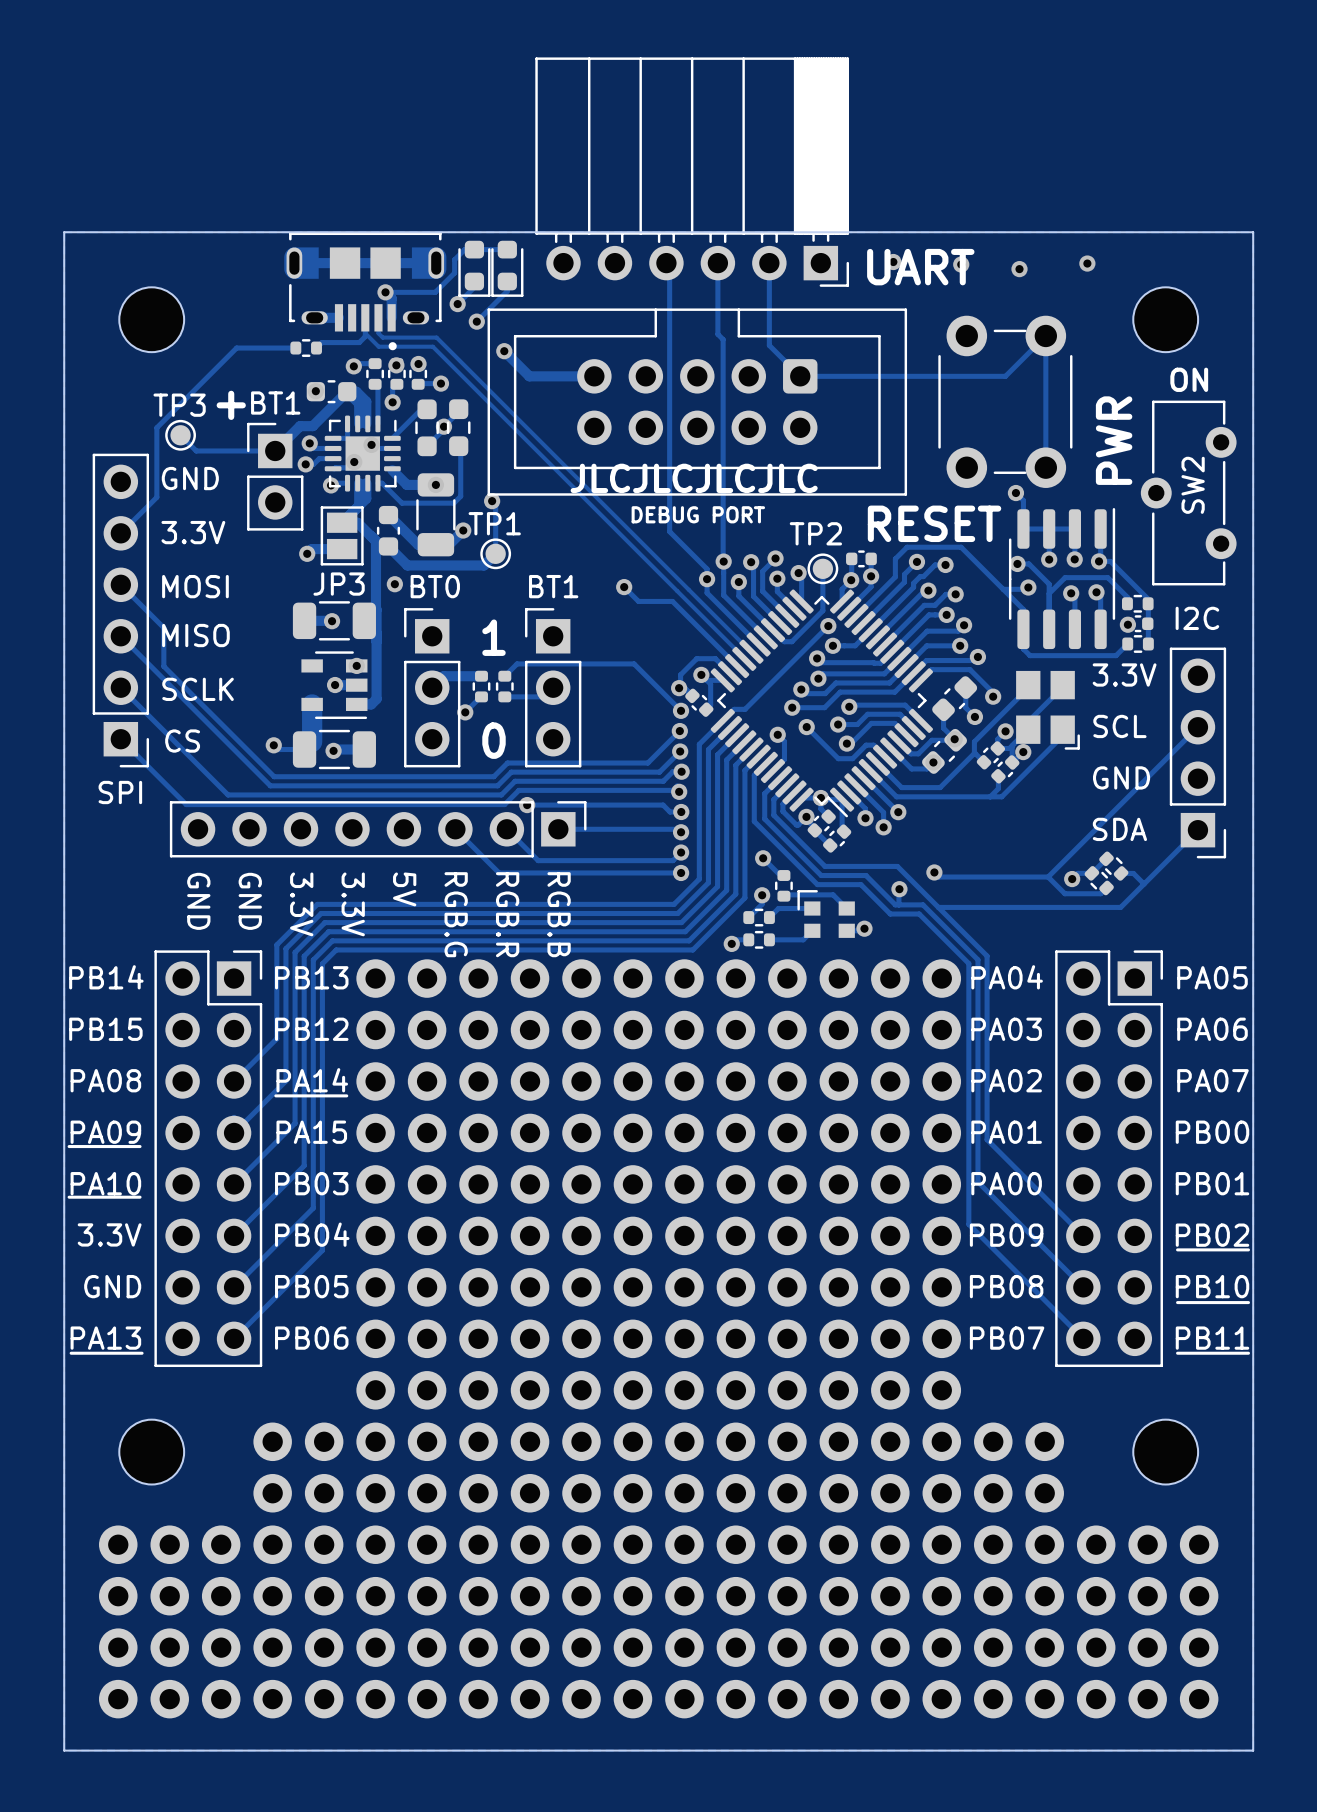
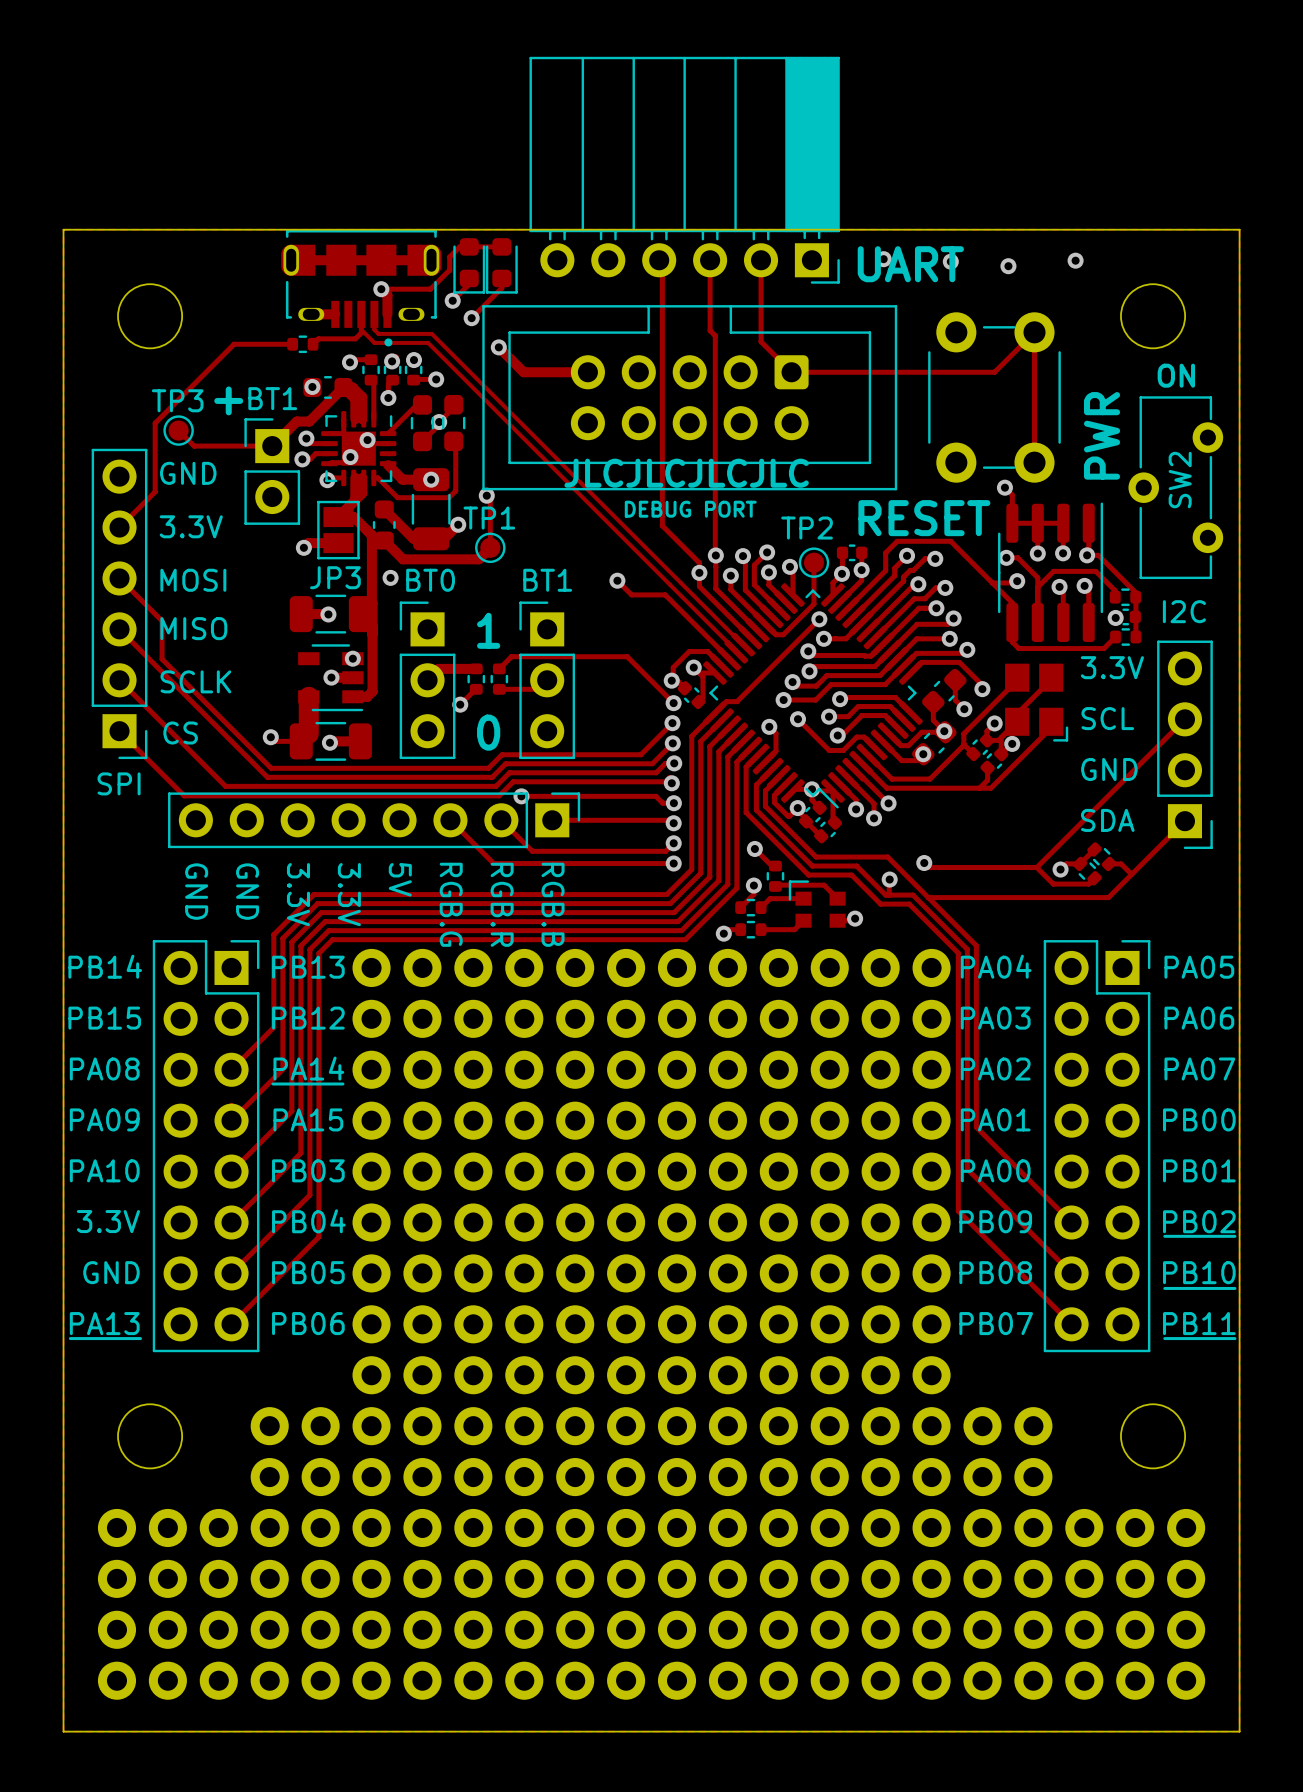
line: (69, 1146) (140, 1146) -> none
line: (69, 1197) (140, 1197) -> none

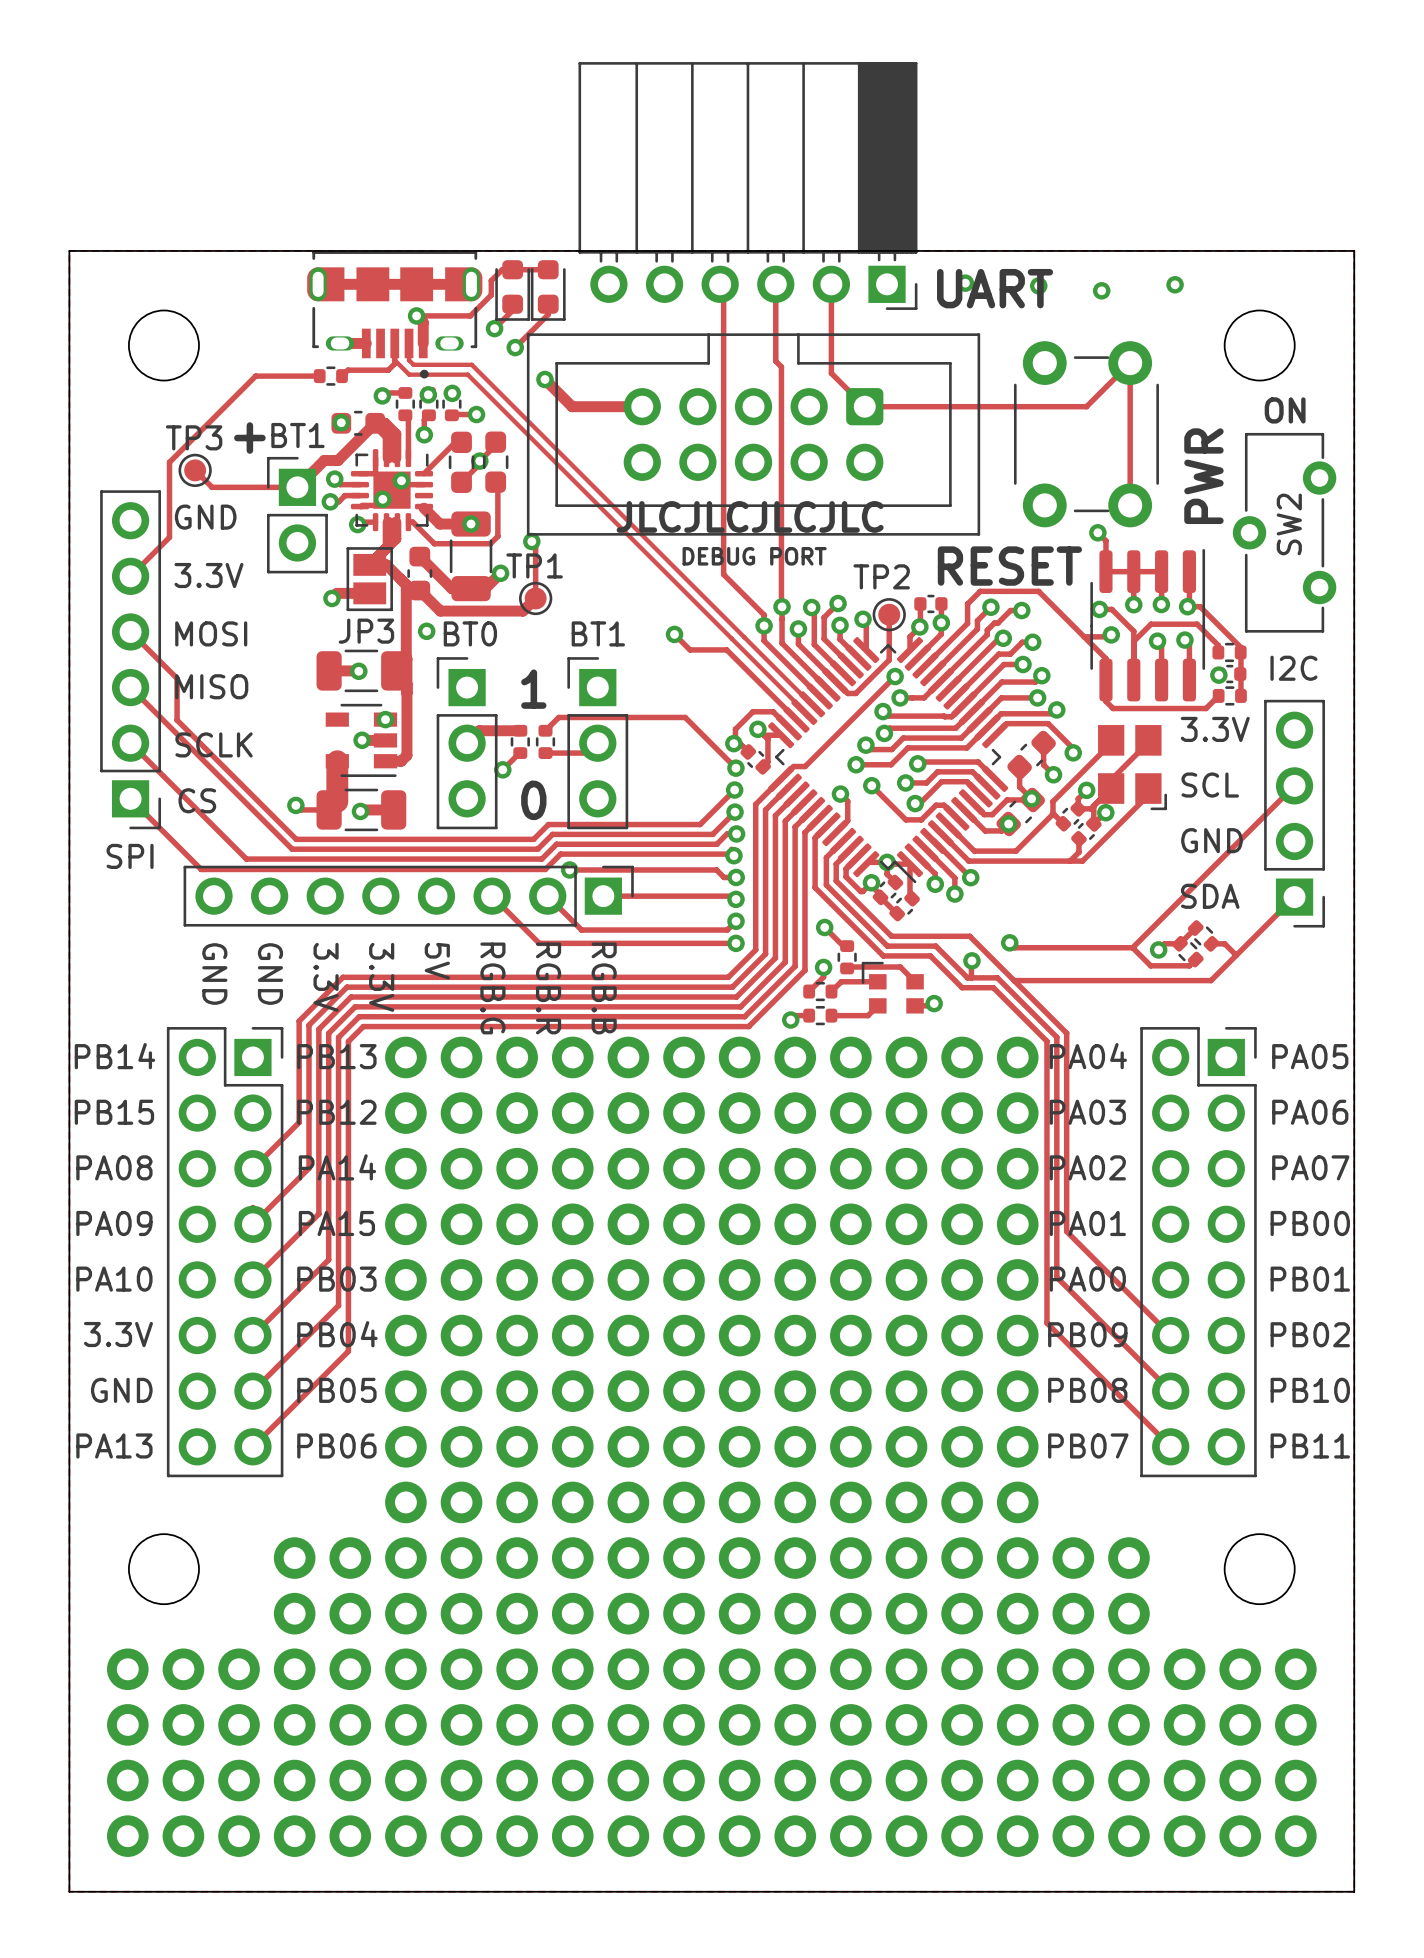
line: (272, 1084) (342, 1084) -> none
line: (1164, 1236) (1234, 1236) -> none
line: (1164, 1288) (1234, 1288) -> none
line: (70, 1338) (140, 1338) -> none
line: (1164, 1338) (1234, 1338) -> none

